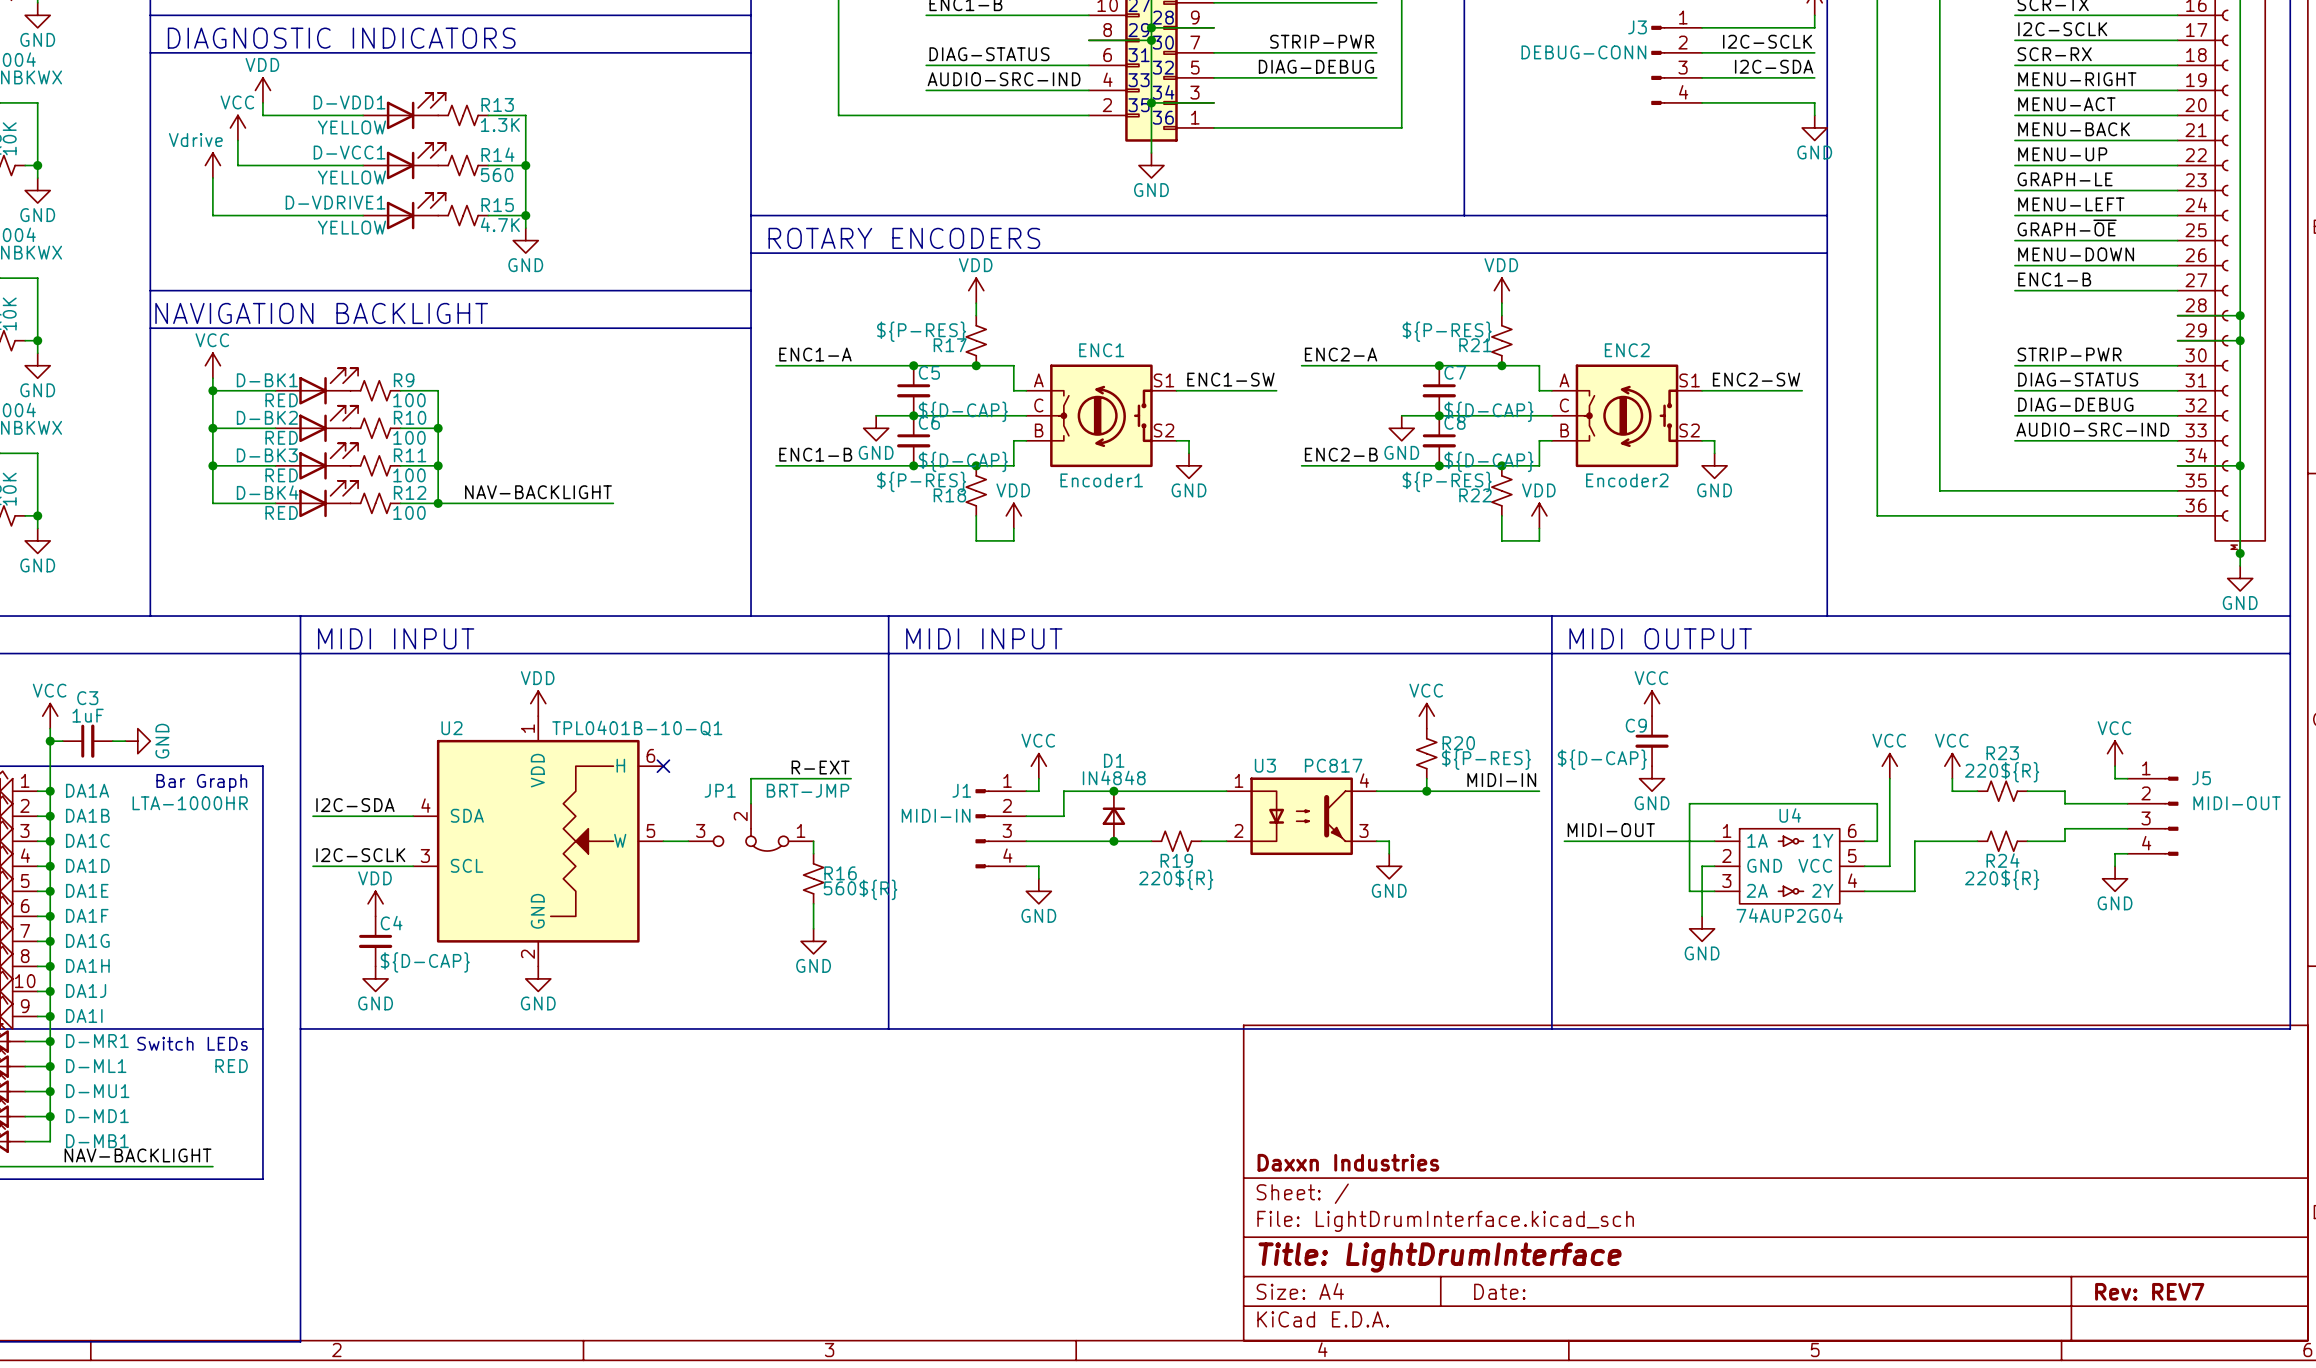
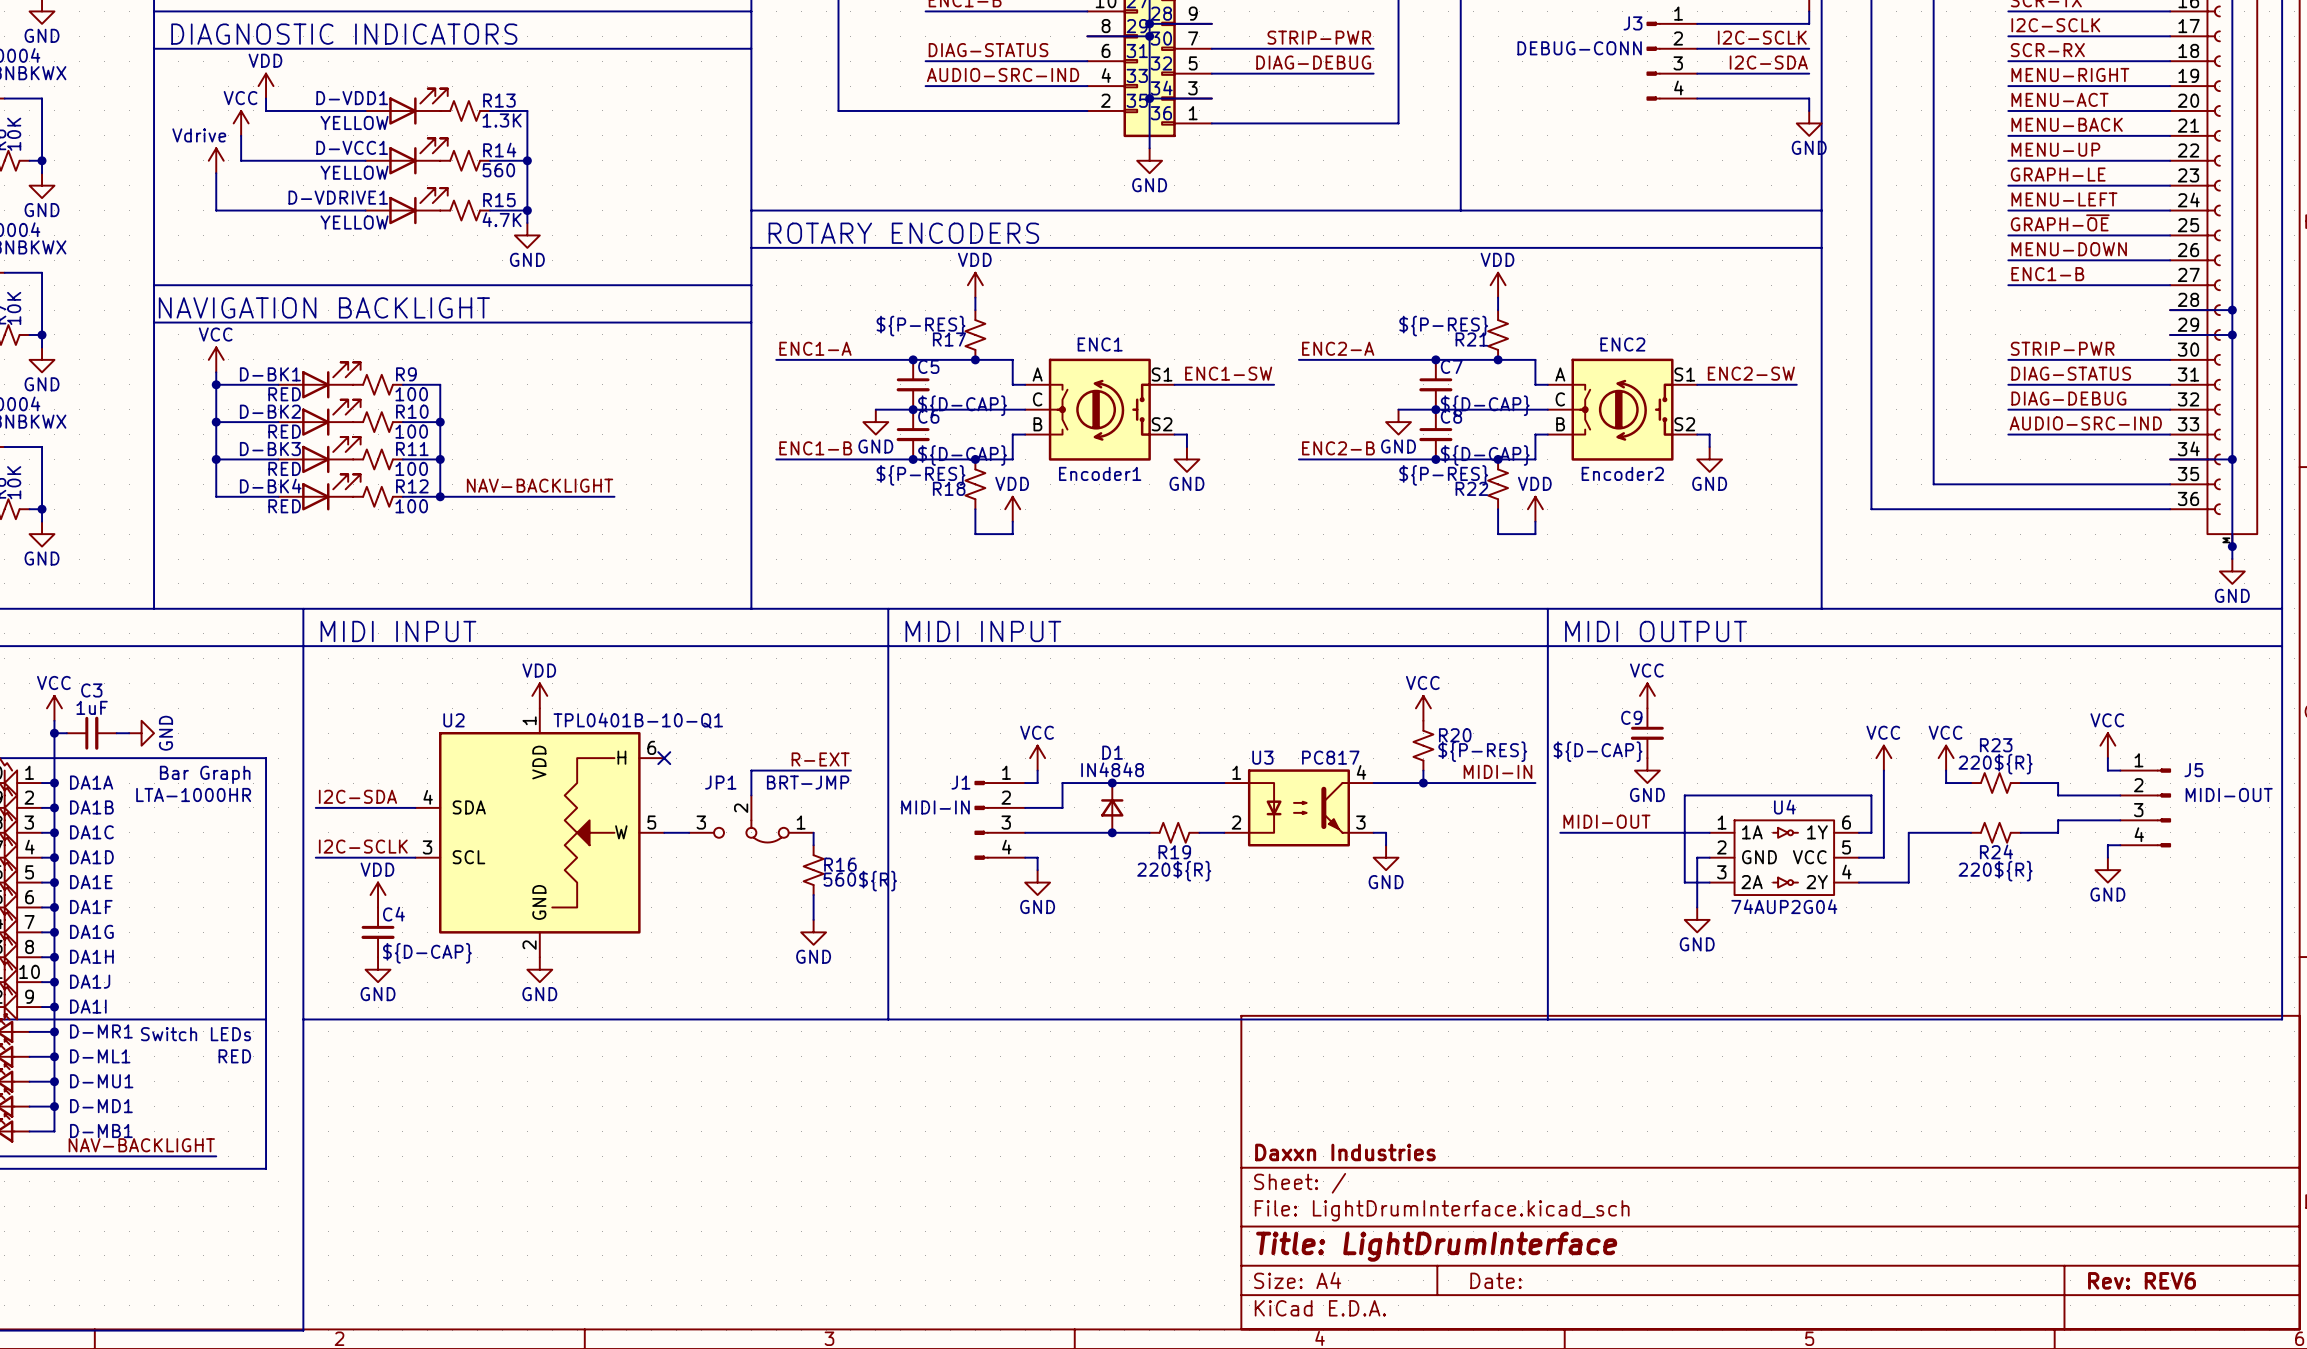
title block: Rev: REV7 (2149, 1291) -> Rev: REV6 (2142, 1280)

